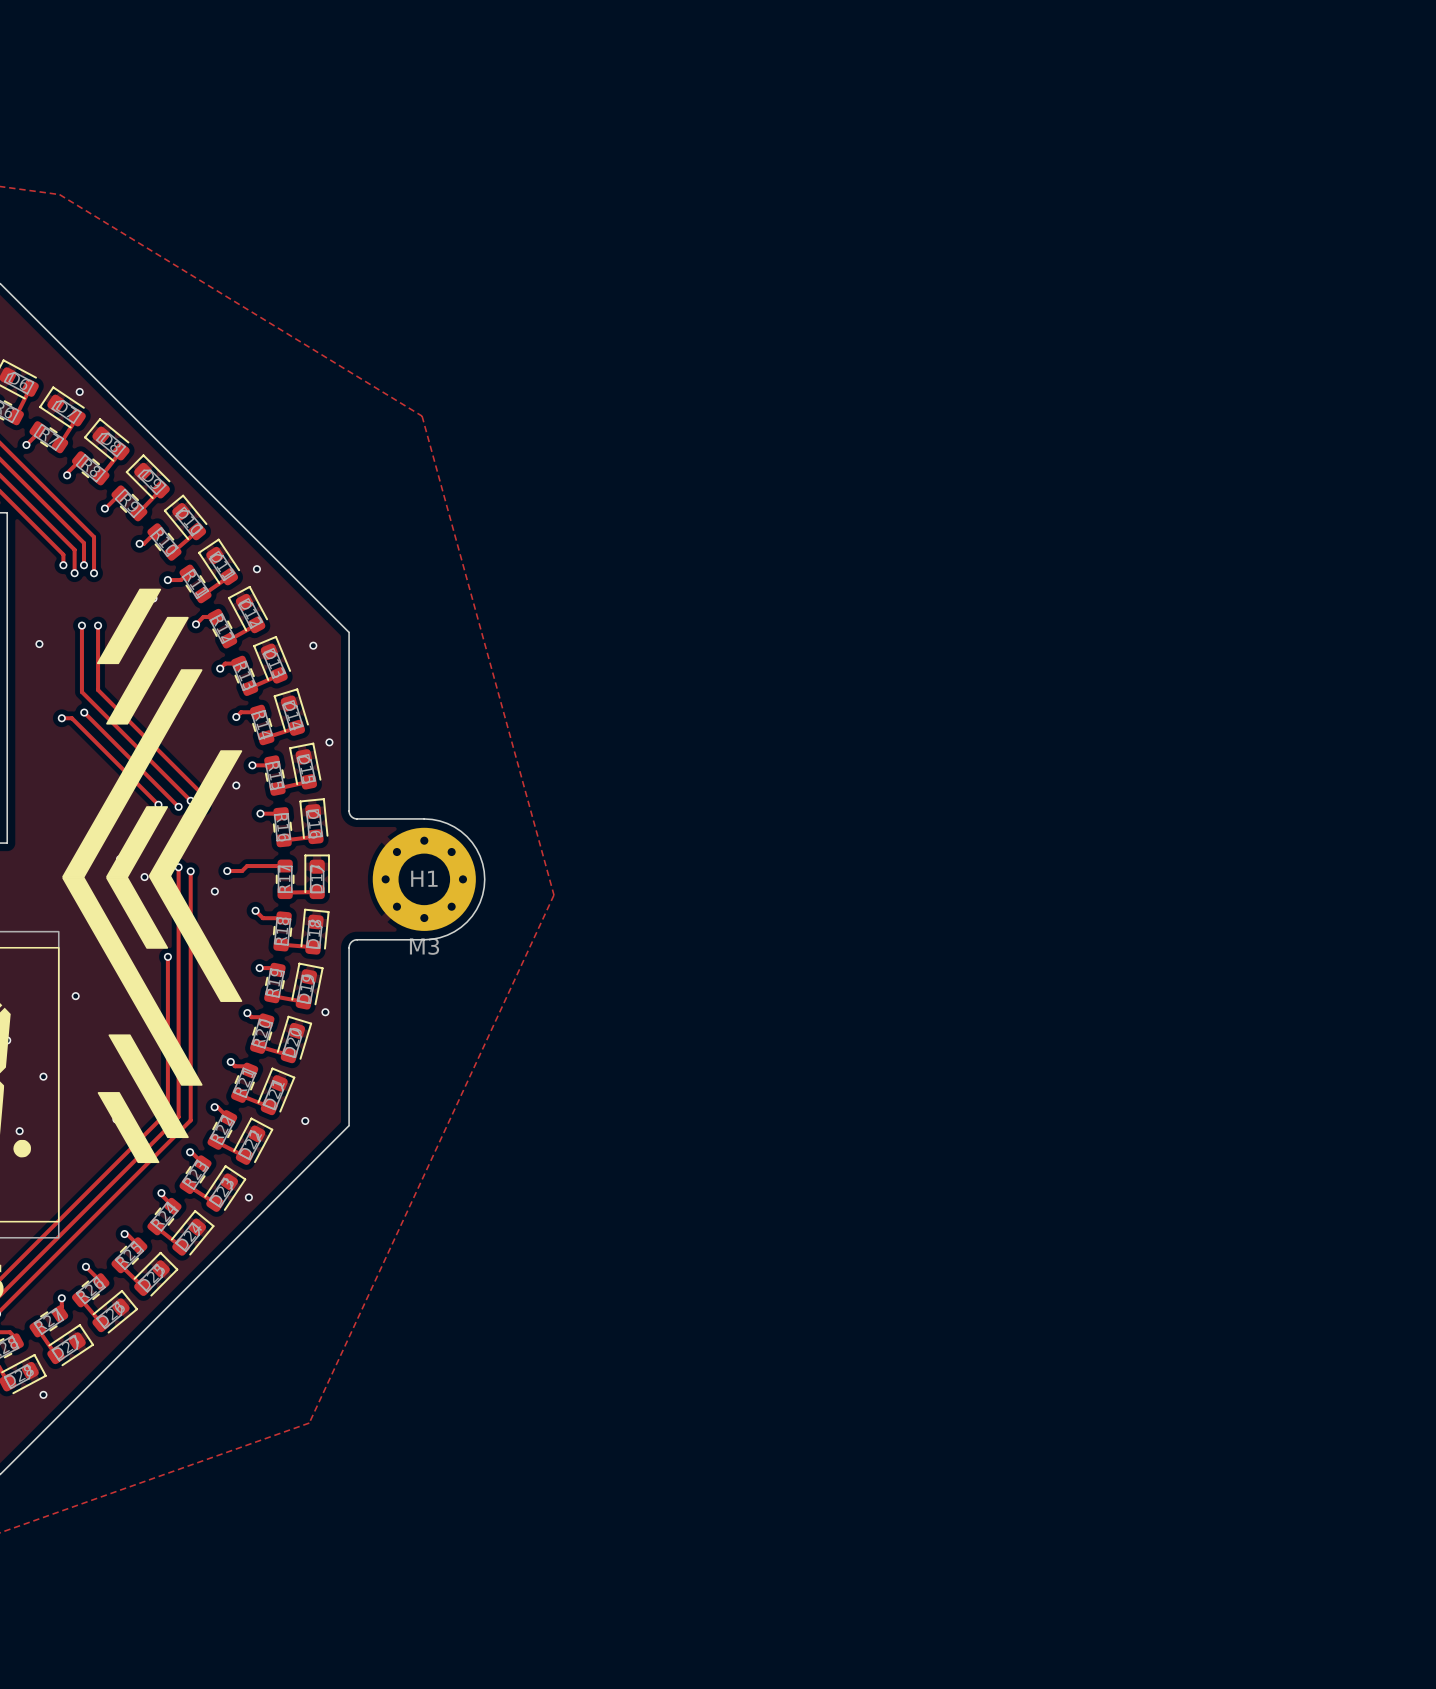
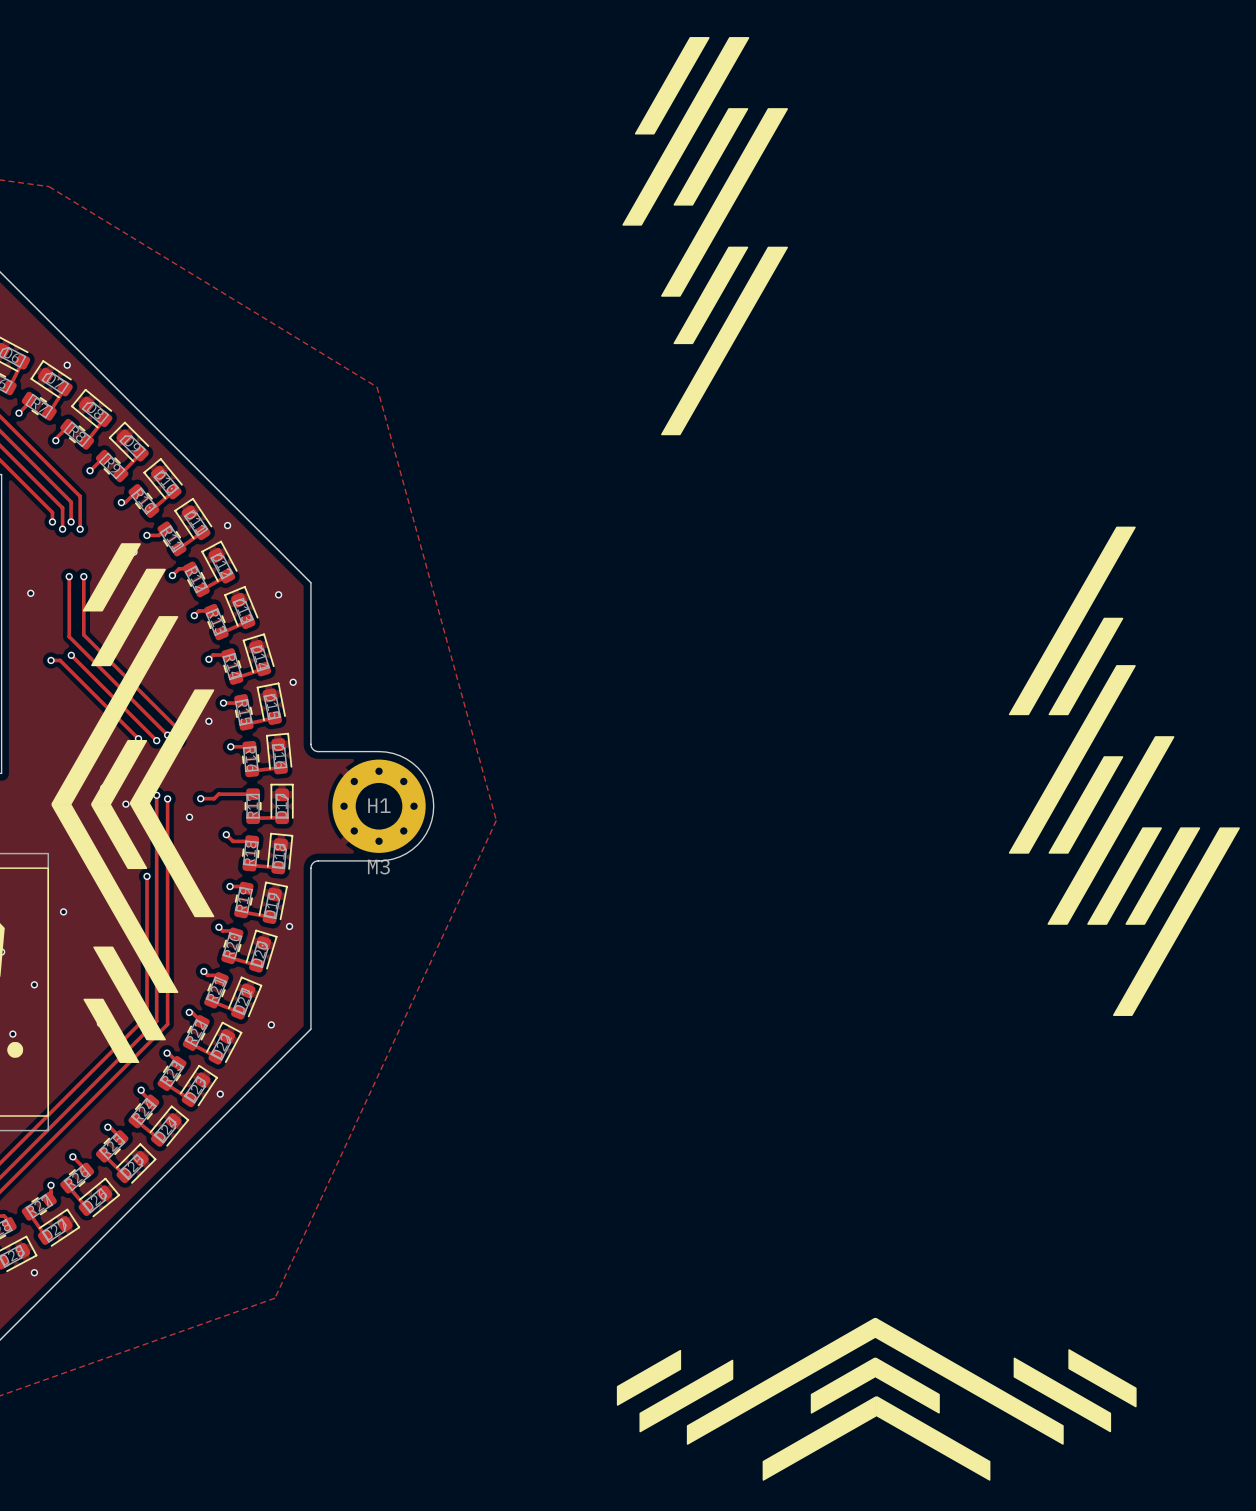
drawing: none -> [622, 37, 788, 436]
drawing: none -> [1008, 526, 1240, 1016]
drawing: none -> [616, 1317, 1137, 1481]

